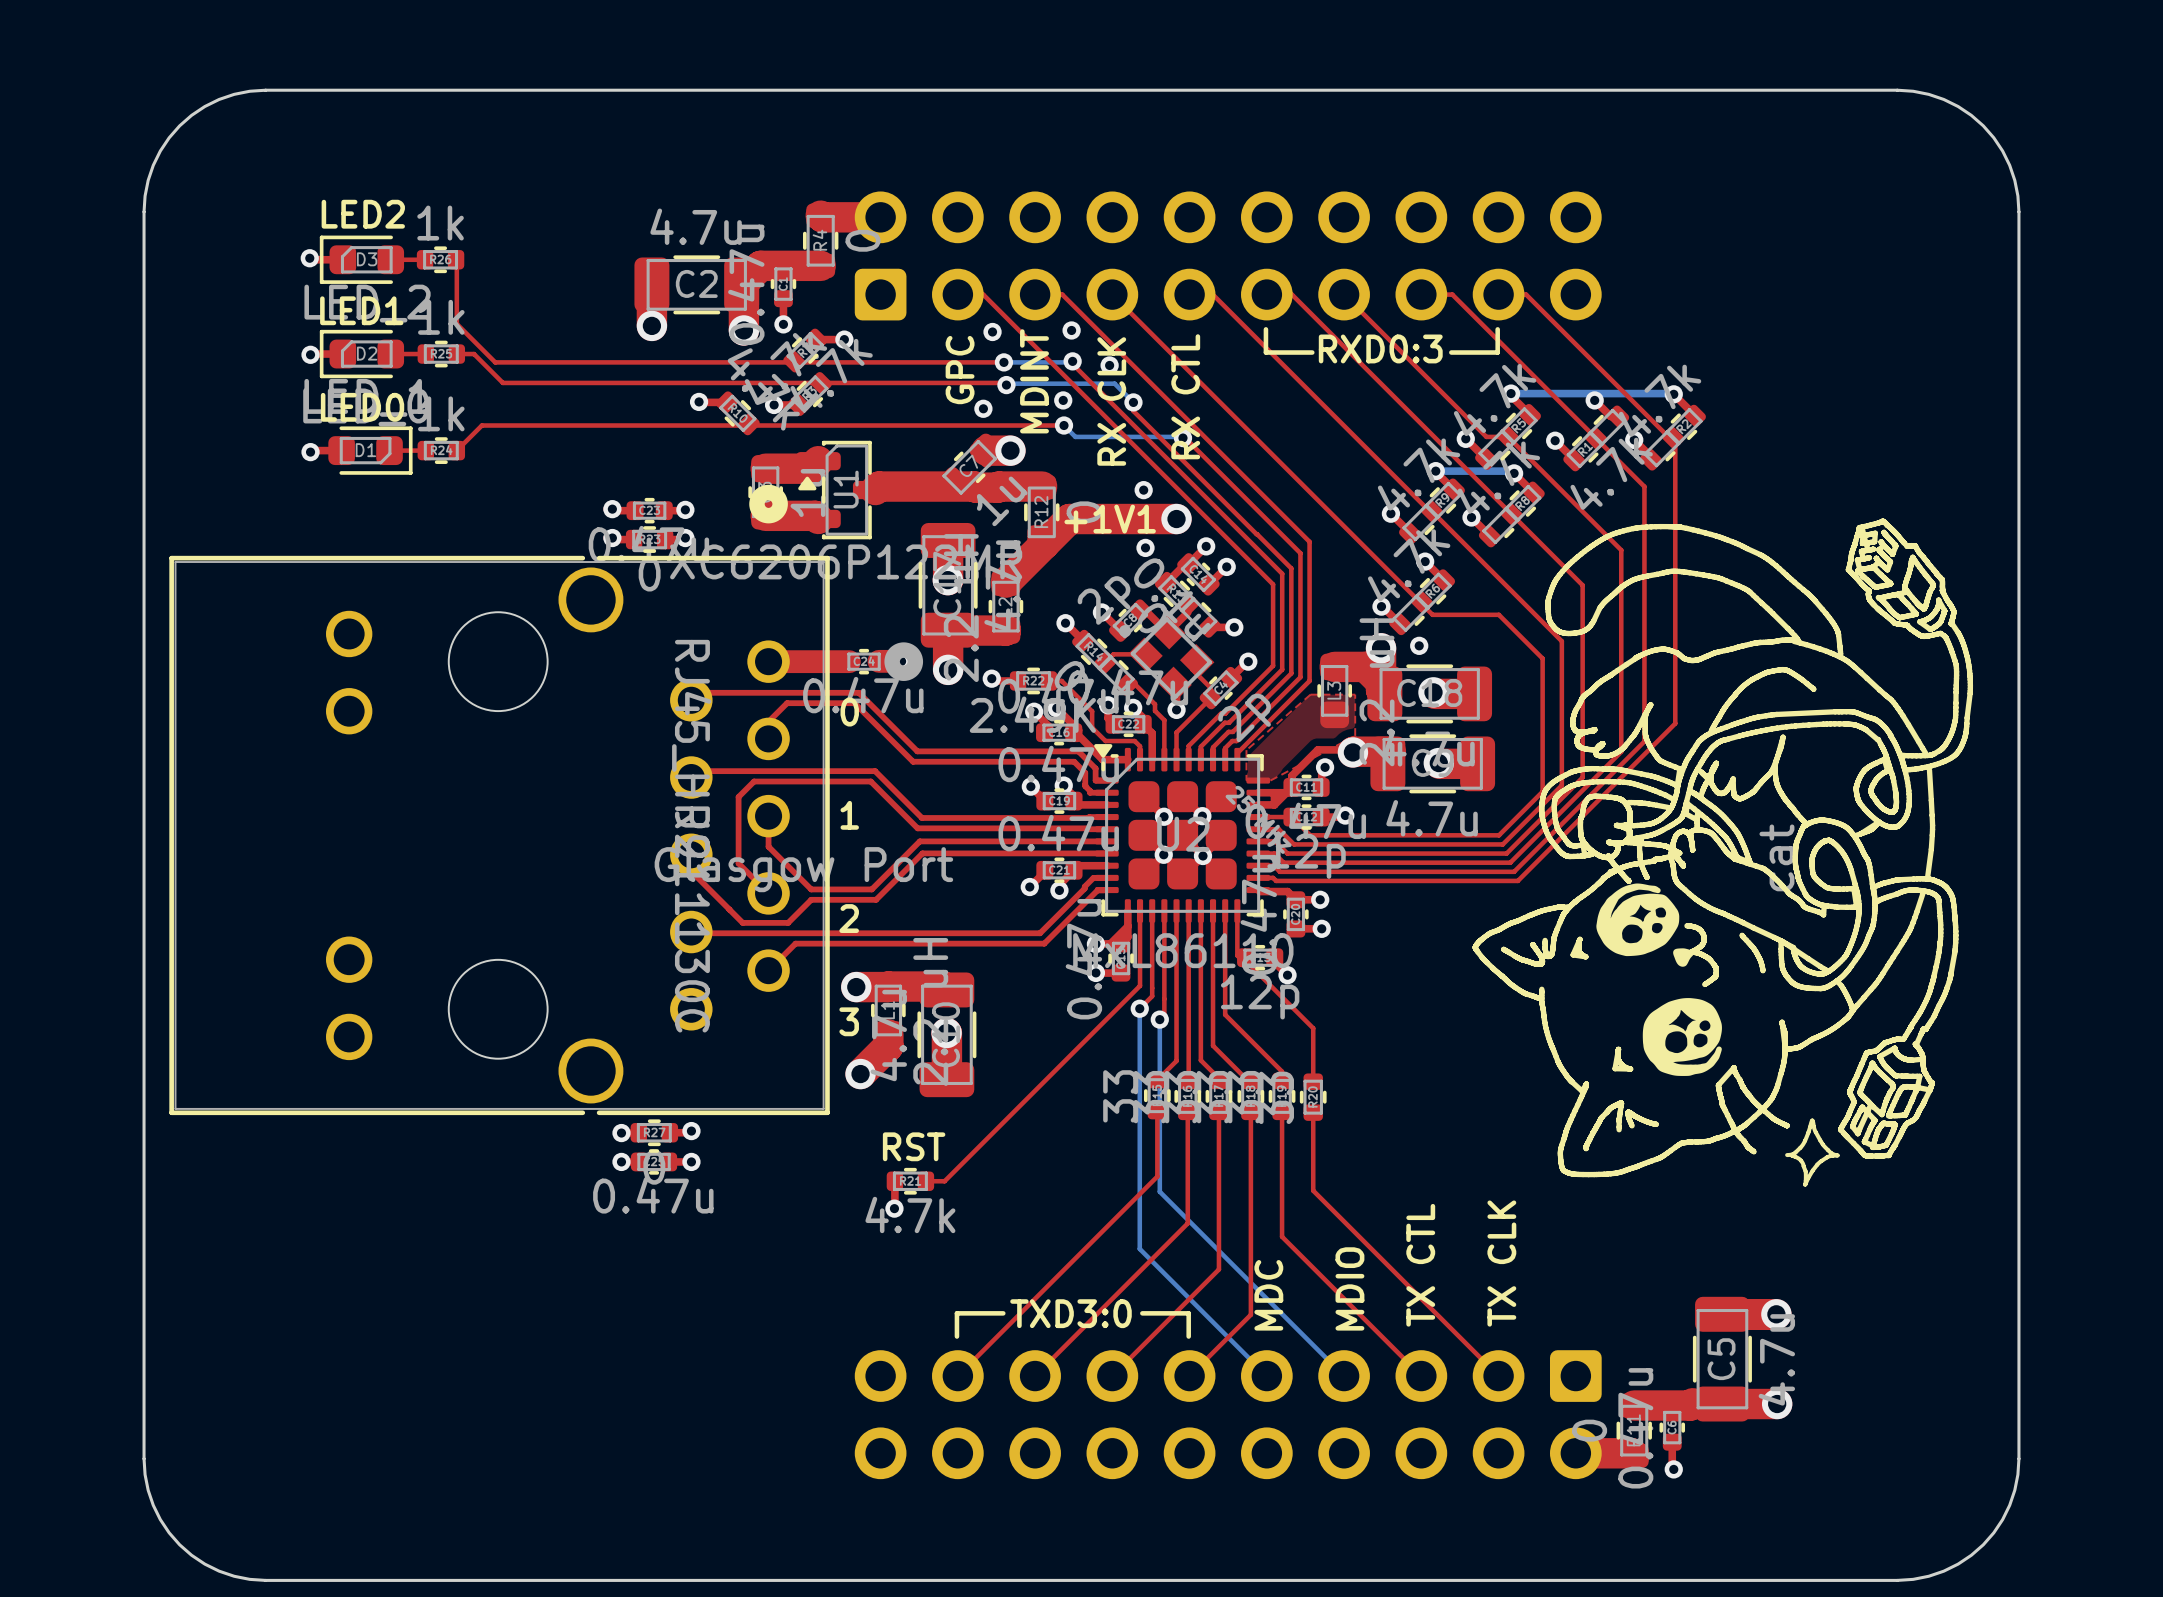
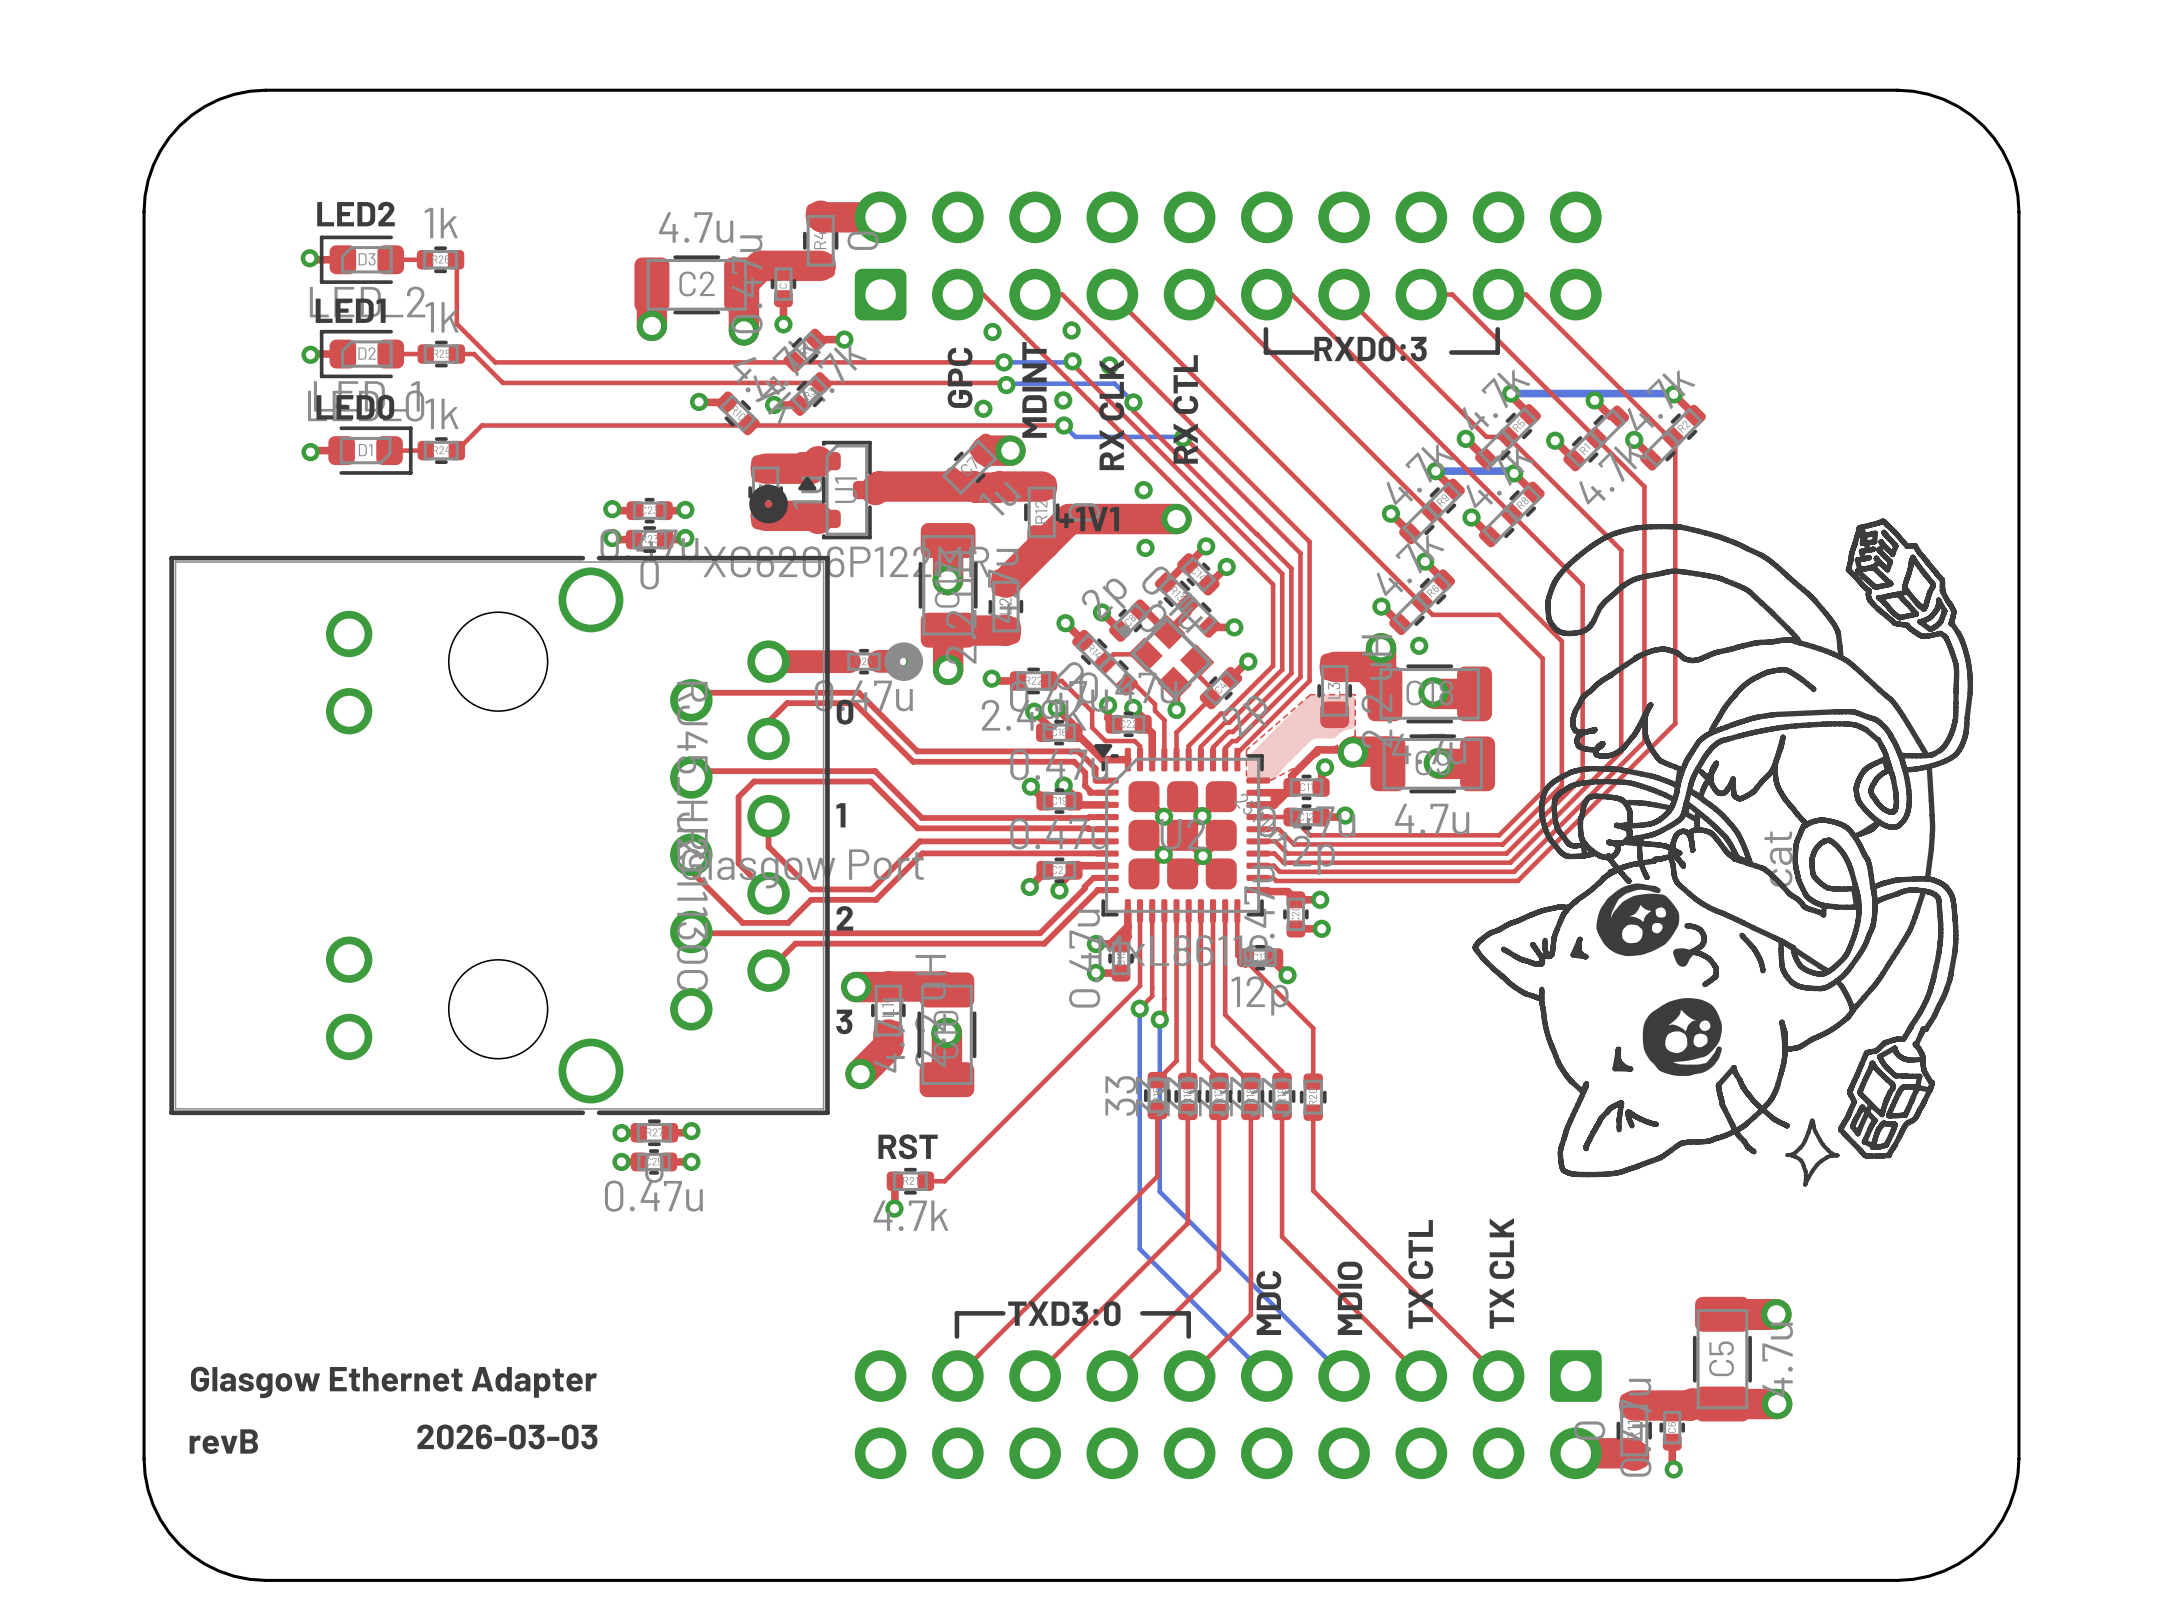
text: none -> Glasgow Ethernet Adapter (393, 1382)
text: none -> 2026-03-03 (507, 1436)
text: none -> revB (223, 1441)

